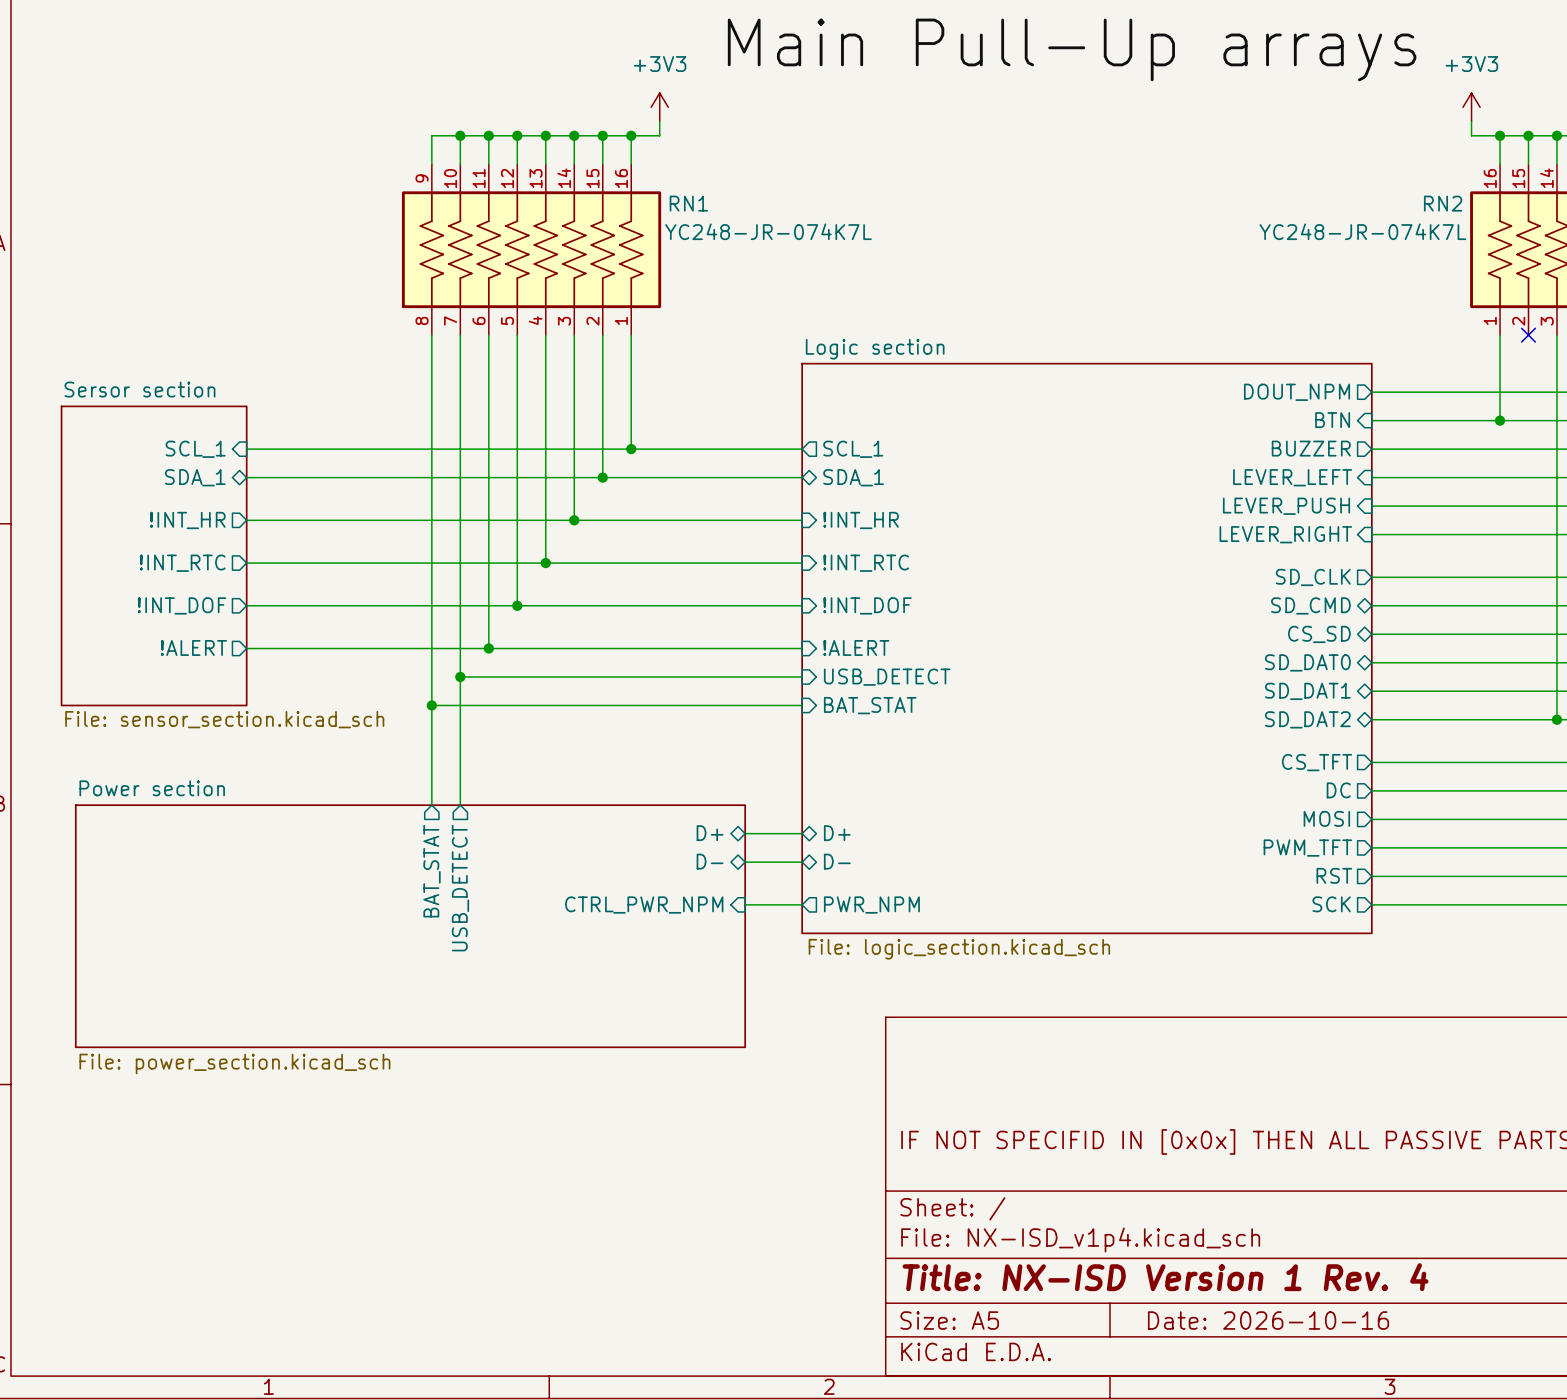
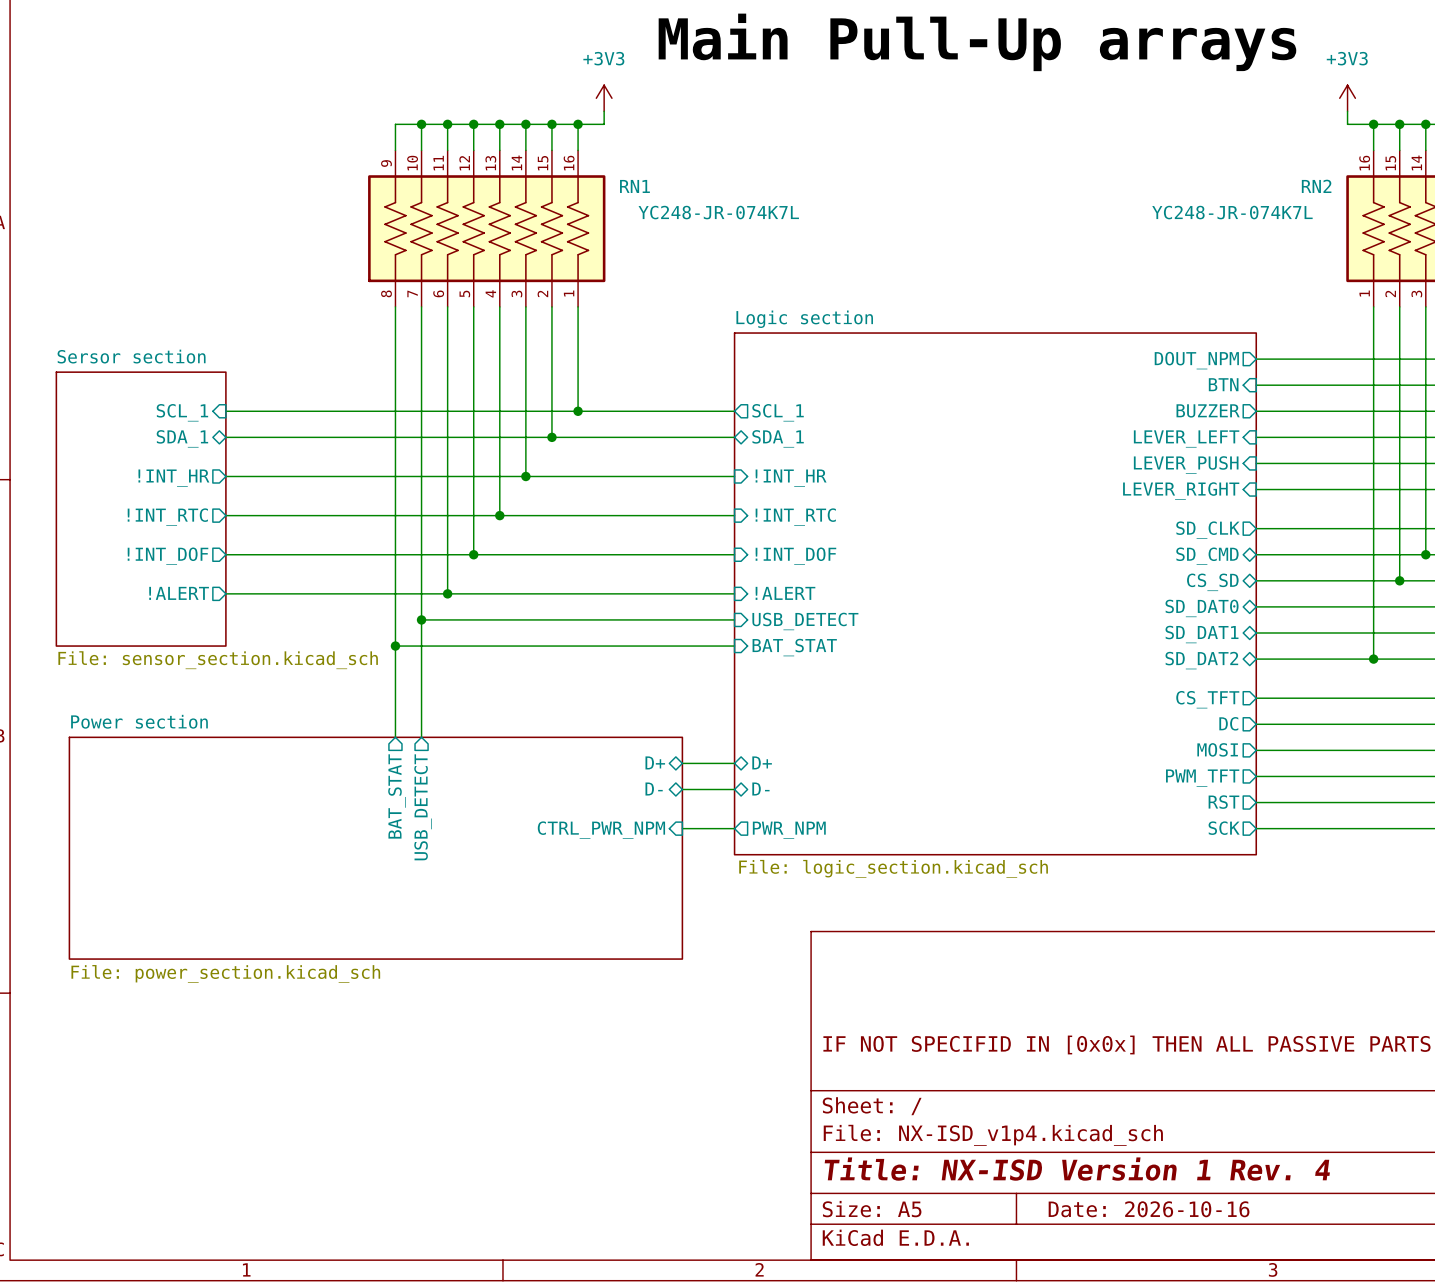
wire: none -> (1399, 306) (1399, 580)
no-connect mark: (1528, 335) -> none
wire: none -> (1373, 385) (1373, 659)
junction: (1500, 420) -> none
wire: (1556, 605) (1556, 719) -> none
junction: none -> (1425, 554)
junction: none -> (1399, 580)
junction: none -> (1373, 659)
junction: (1556, 719) -> none

